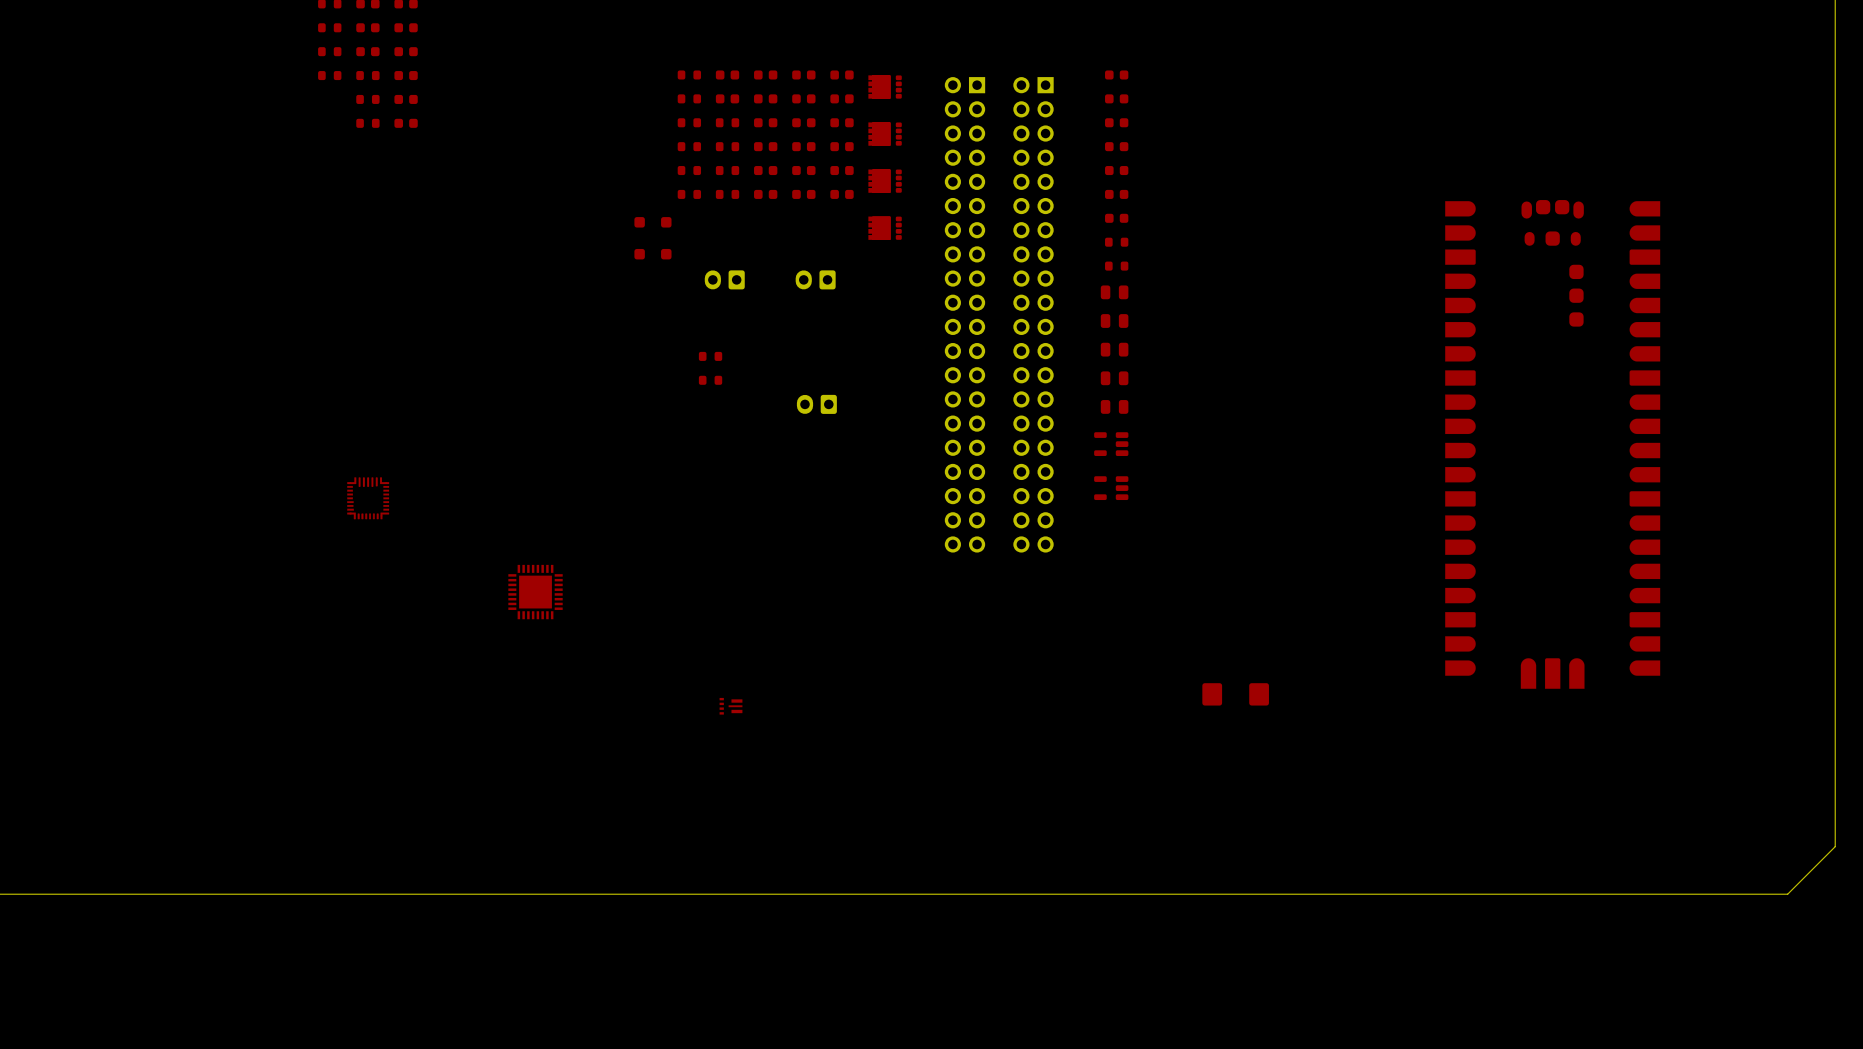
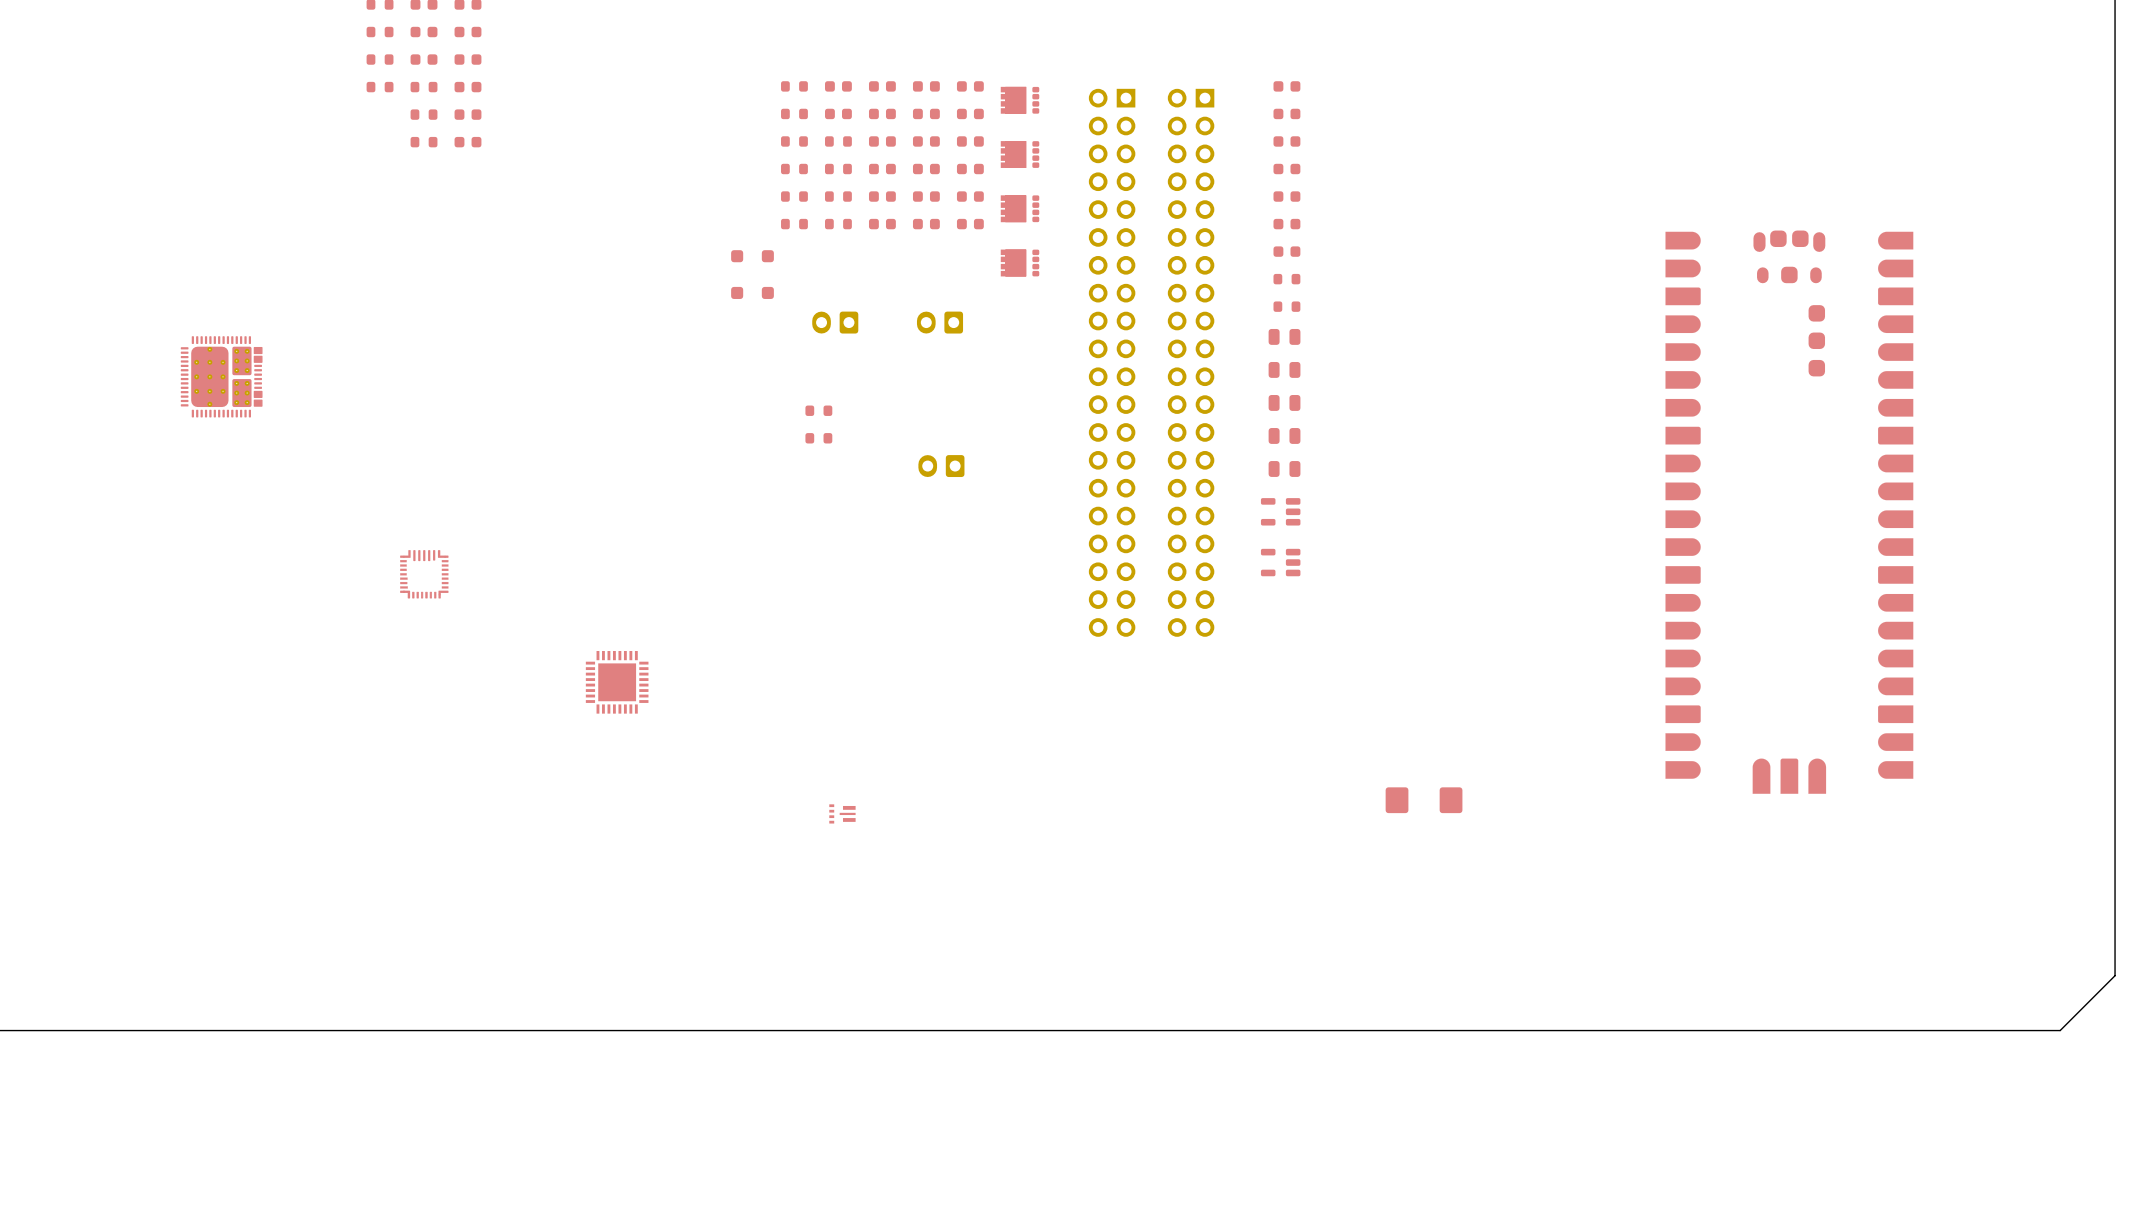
part: none -> (221, 376)

